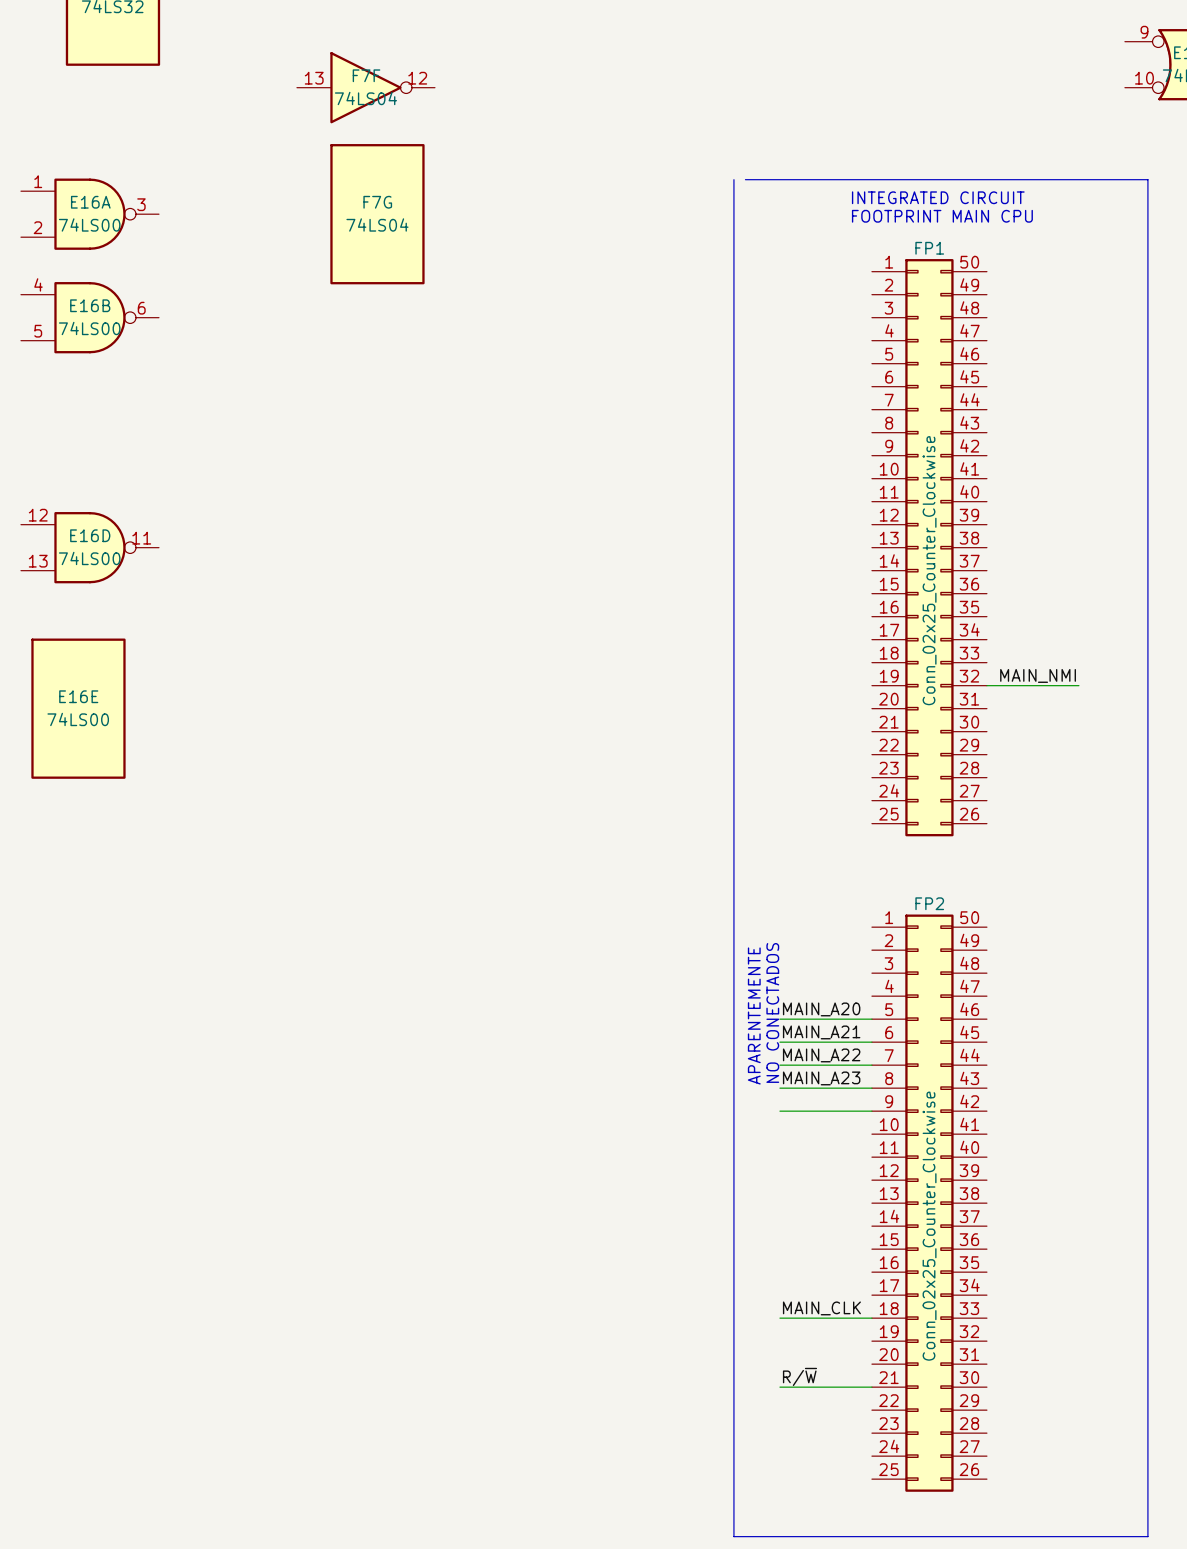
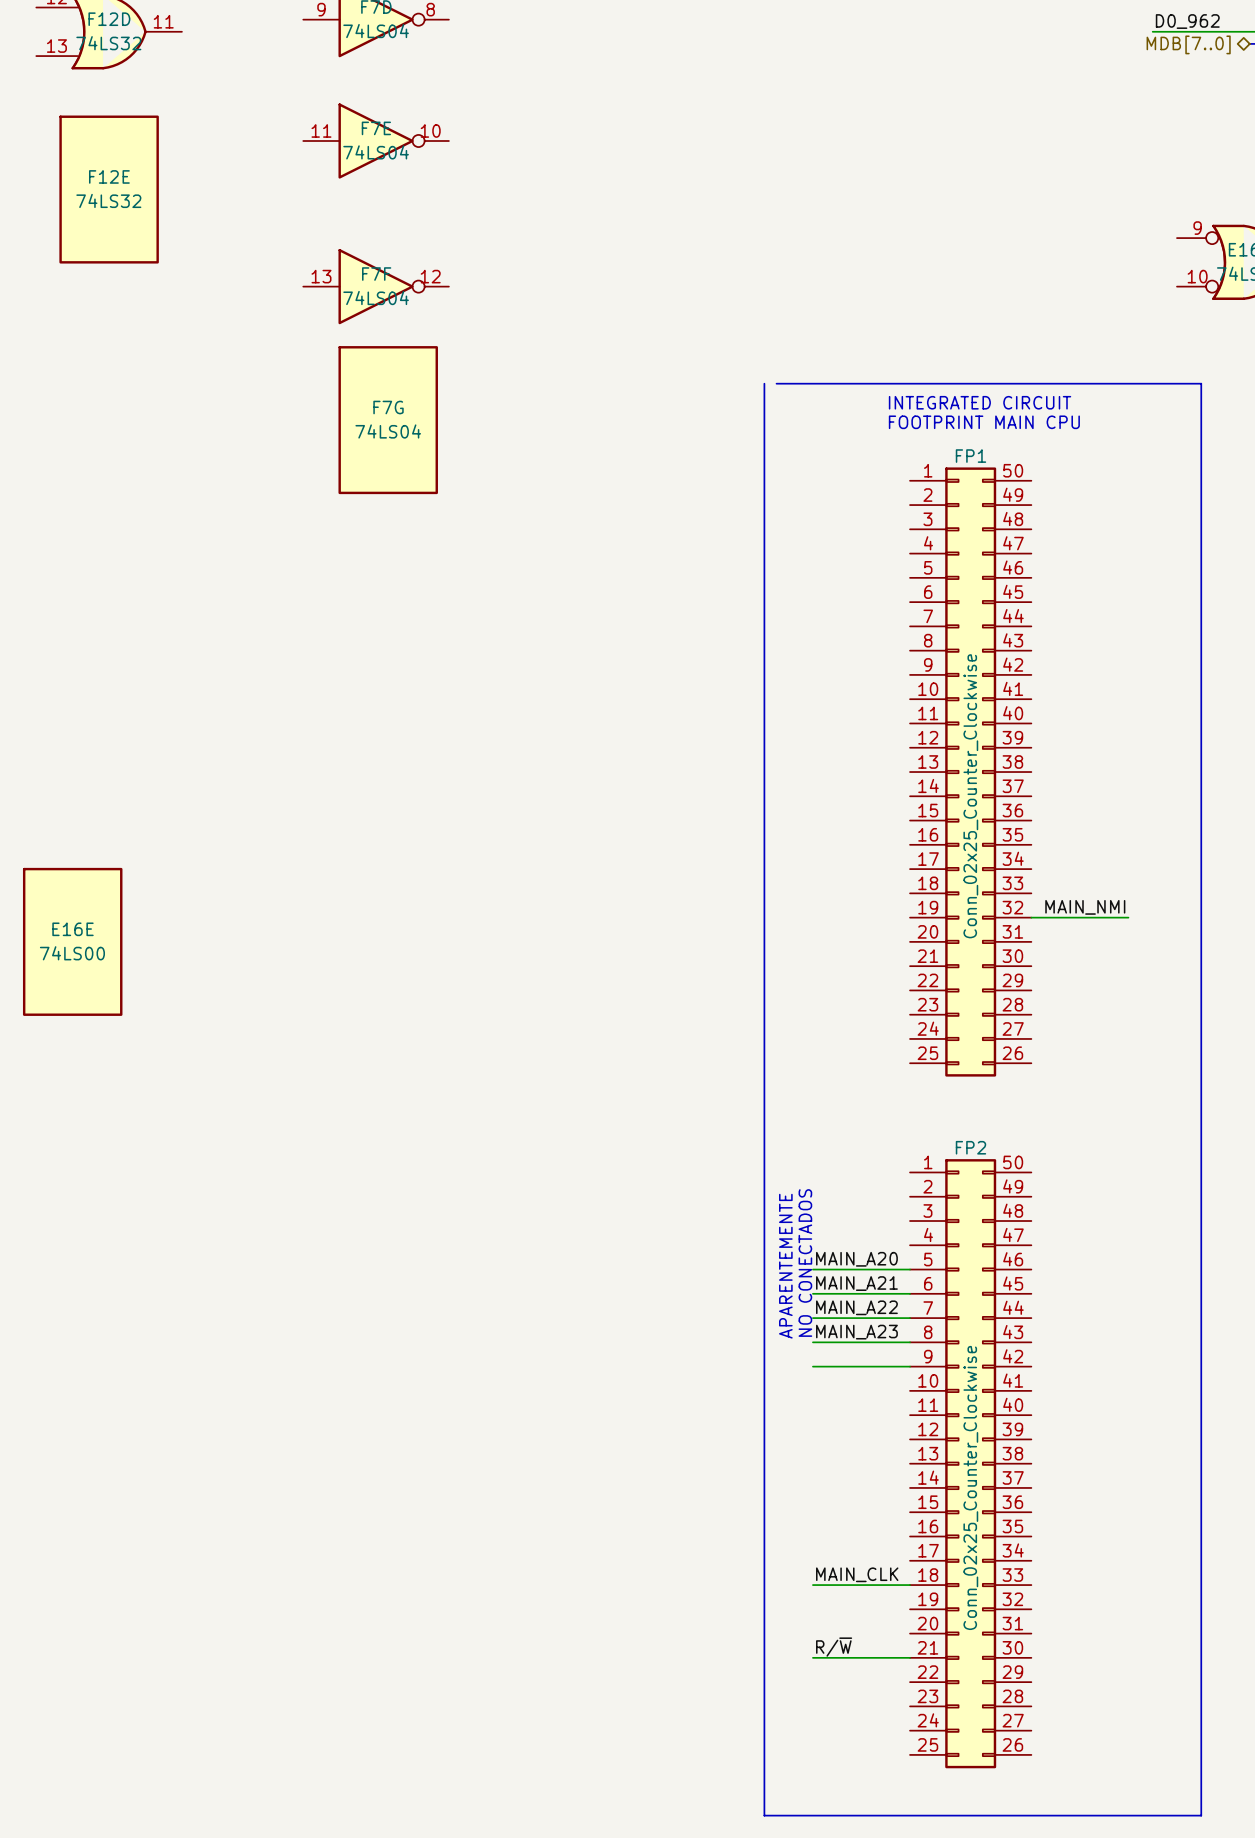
E16A: 74LS00 (89, 214) -> none
E16B: 74LS00 (89, 317) -> none
E16D: 74LS00 (89, 547) -> none

